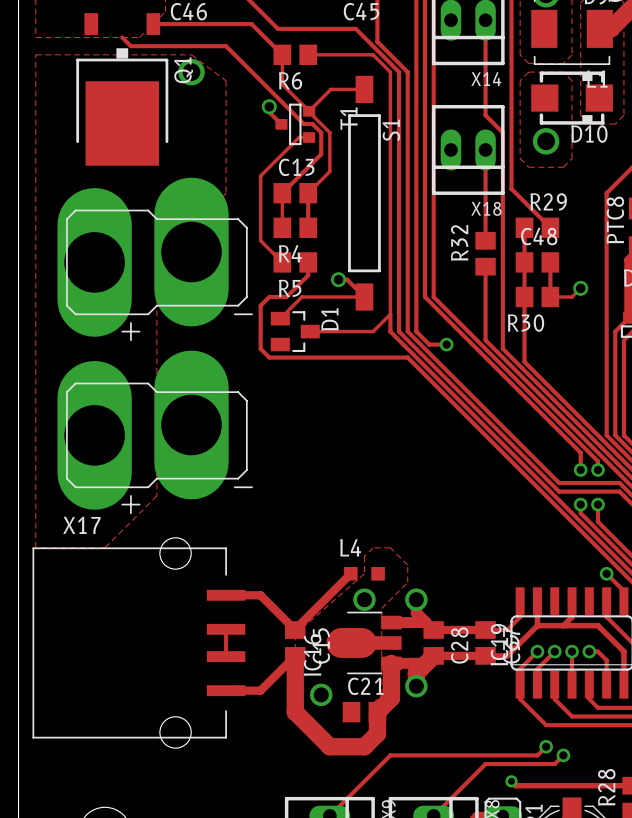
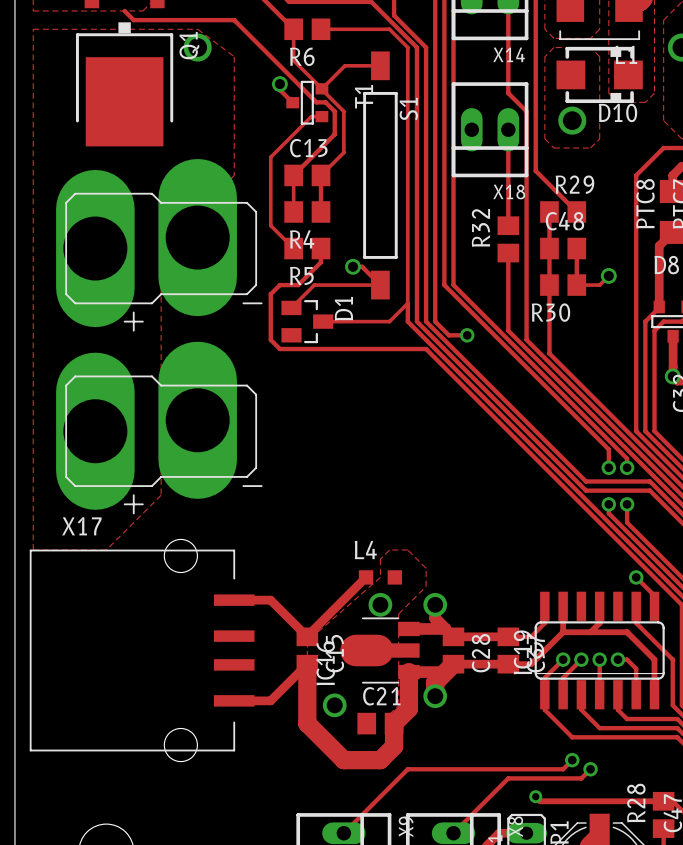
track: (226, 629) (226, 656) -> none

